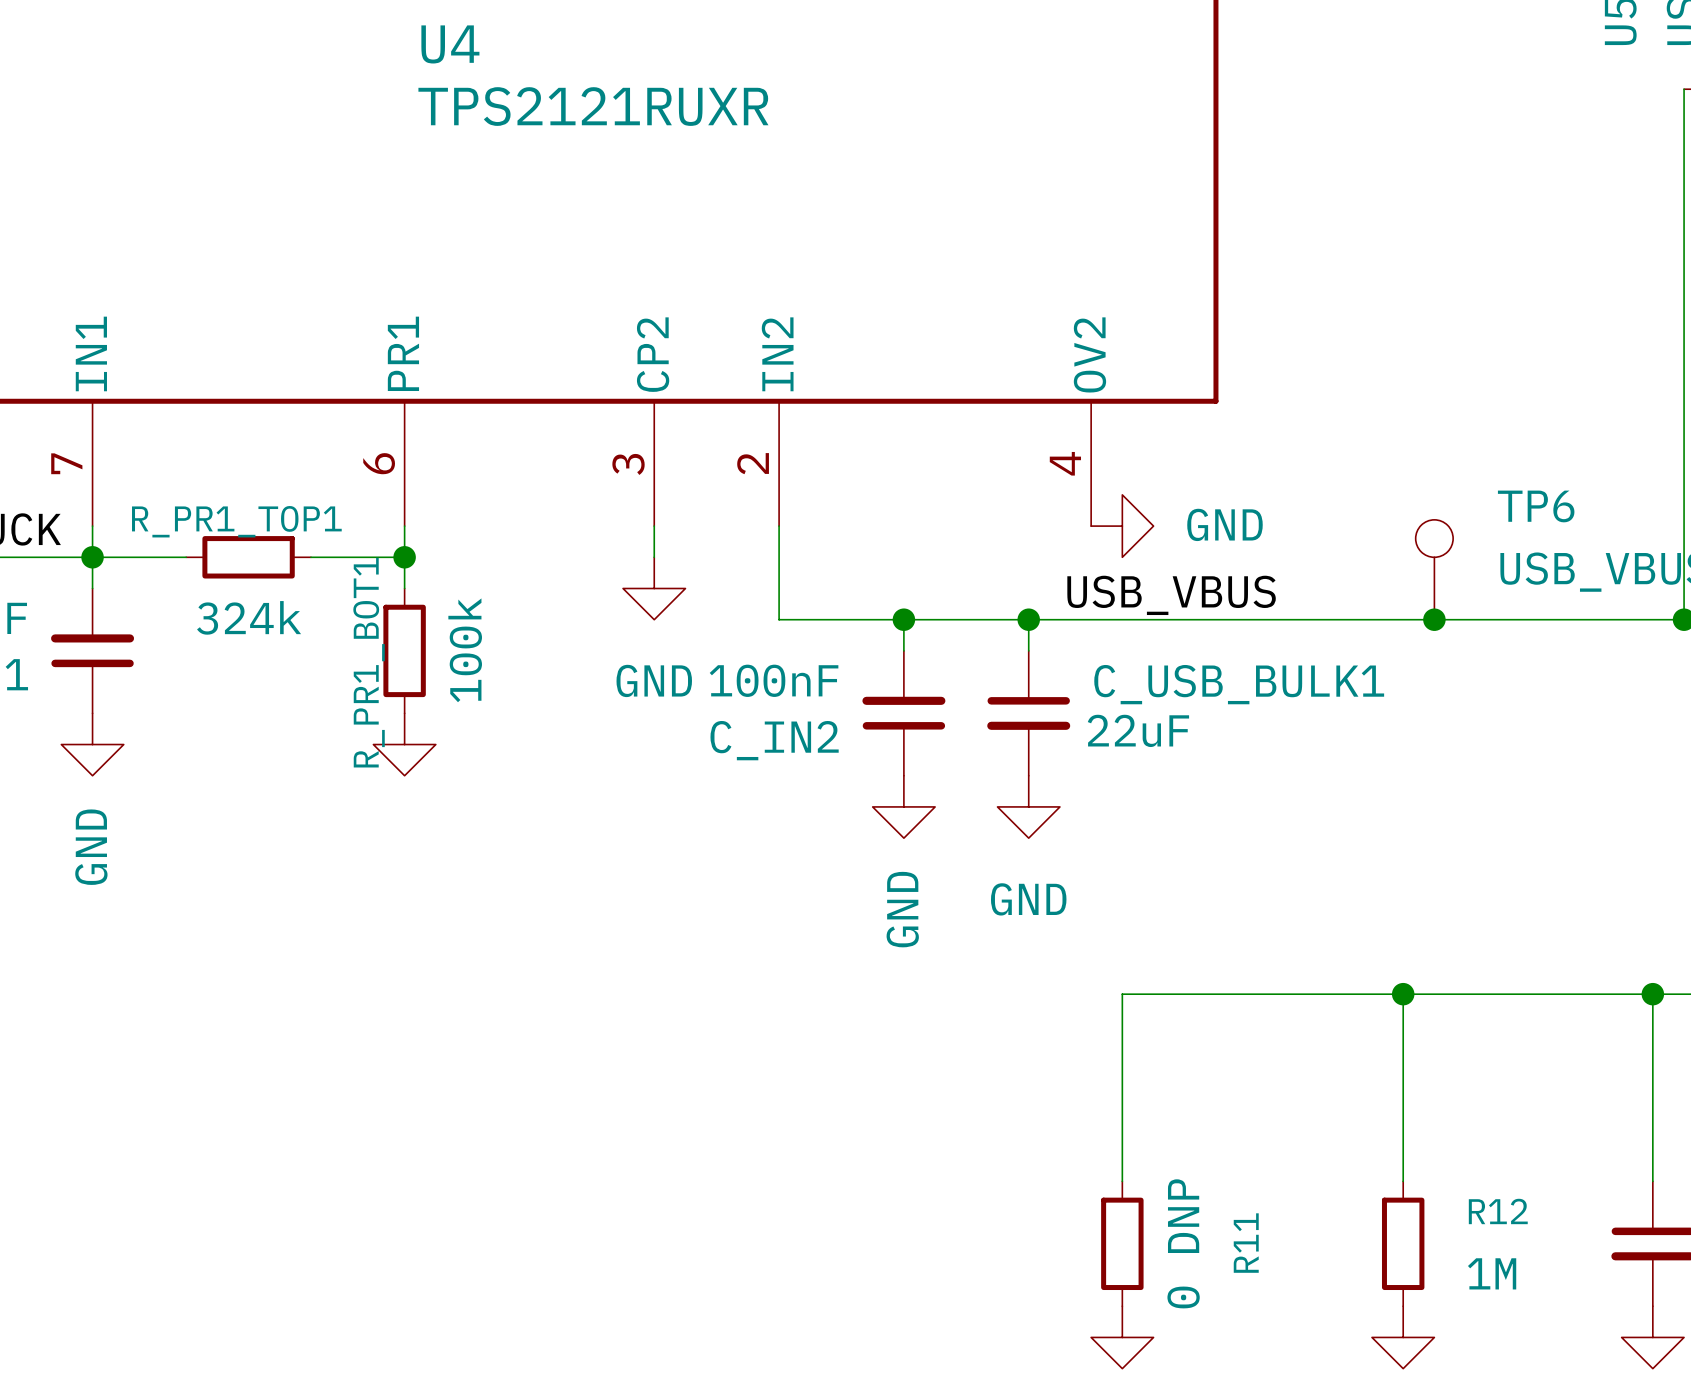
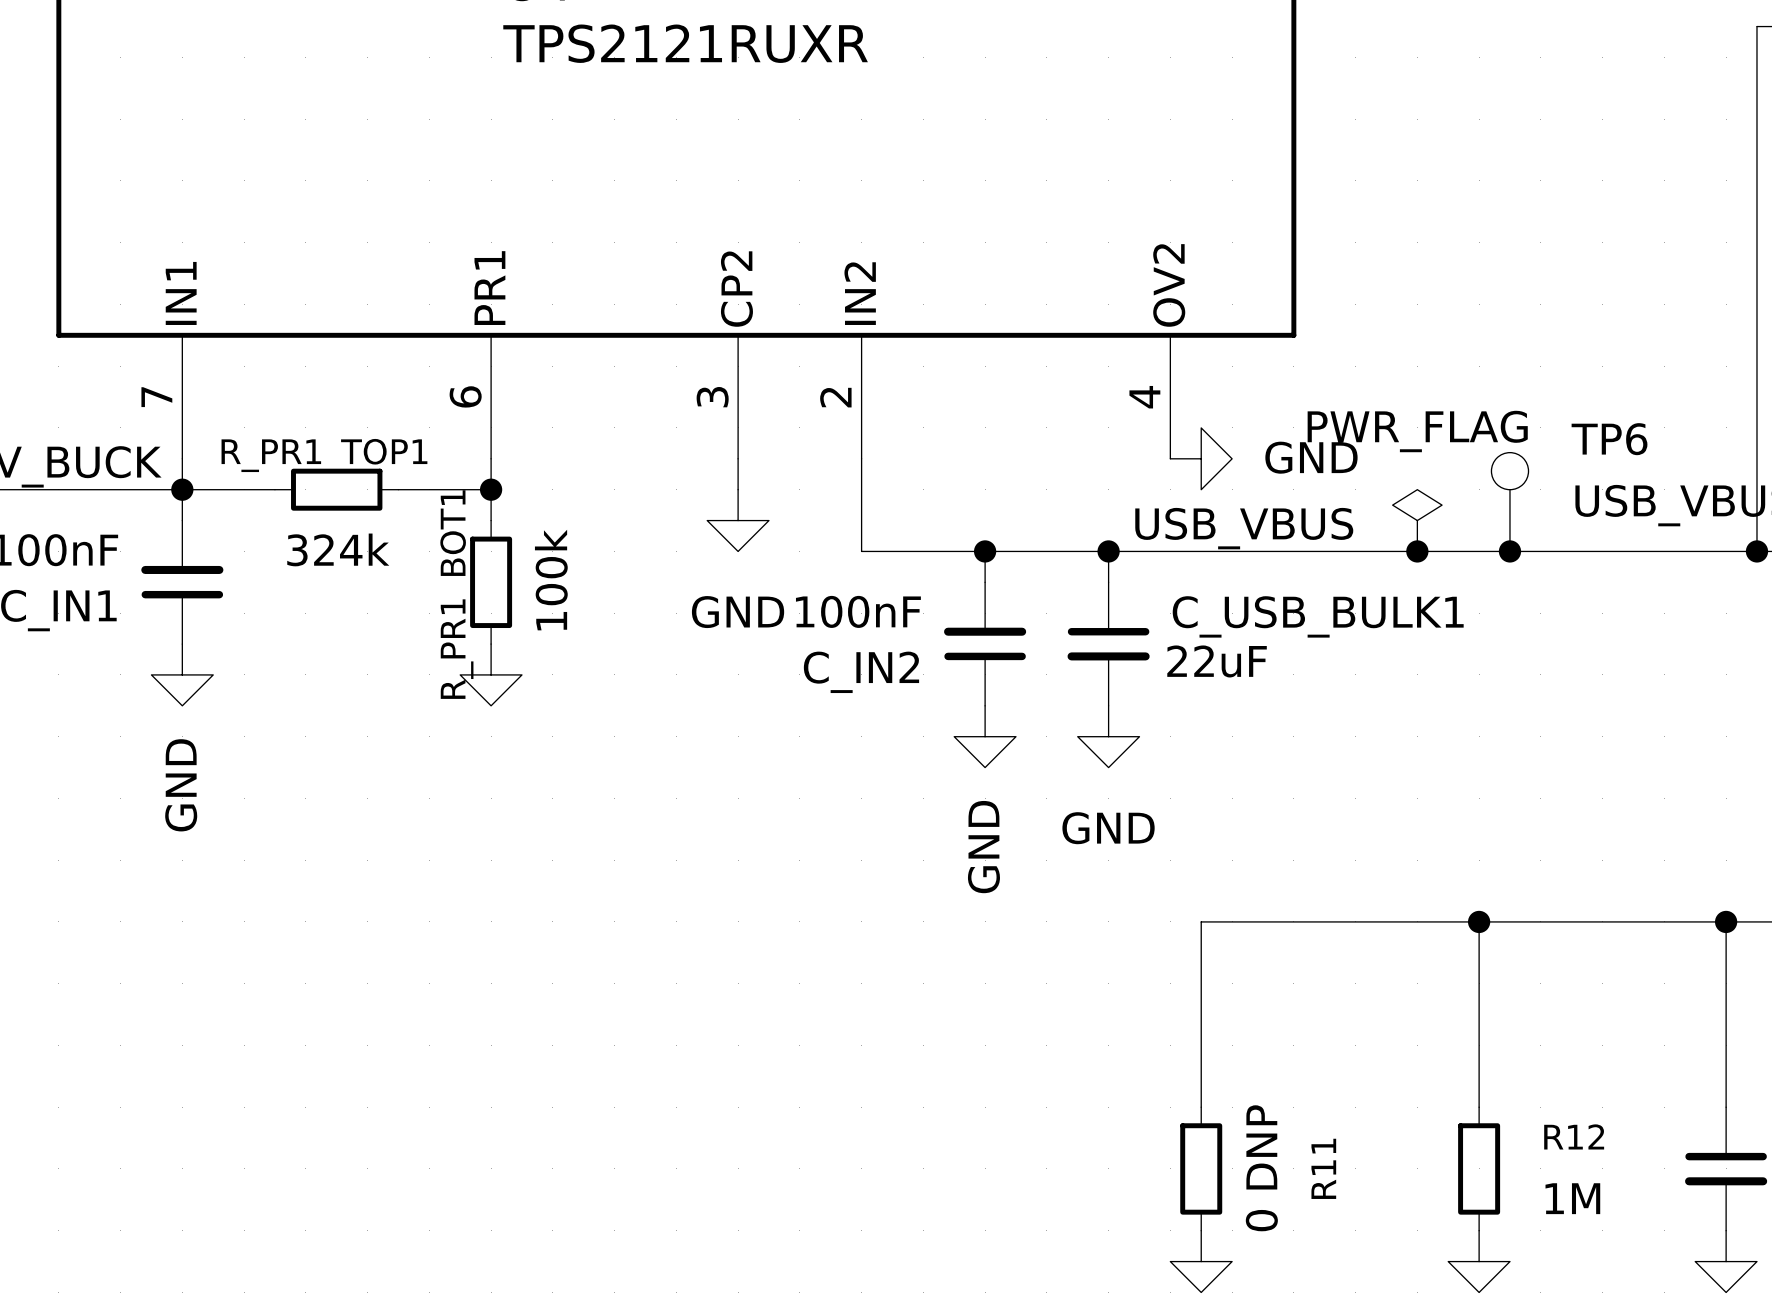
power symbol: none -> PWR_FLAG (1417, 520)
junction: none -> (1417, 551)

